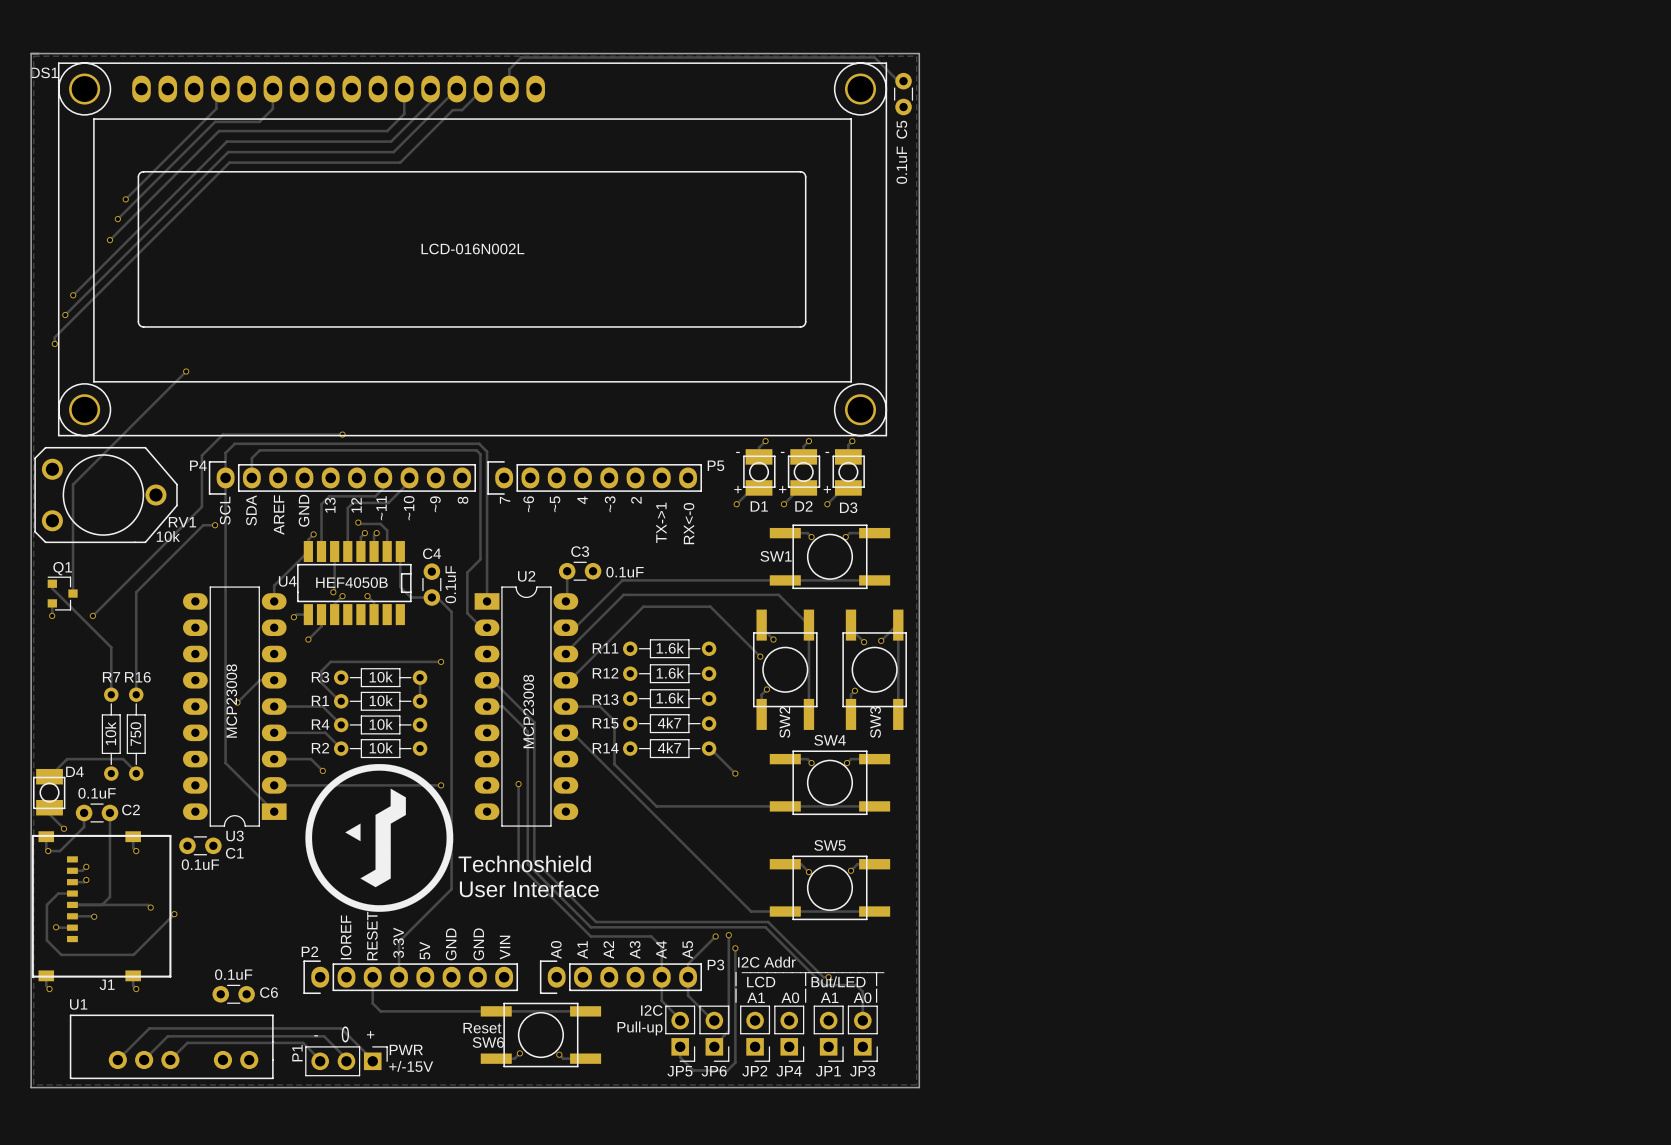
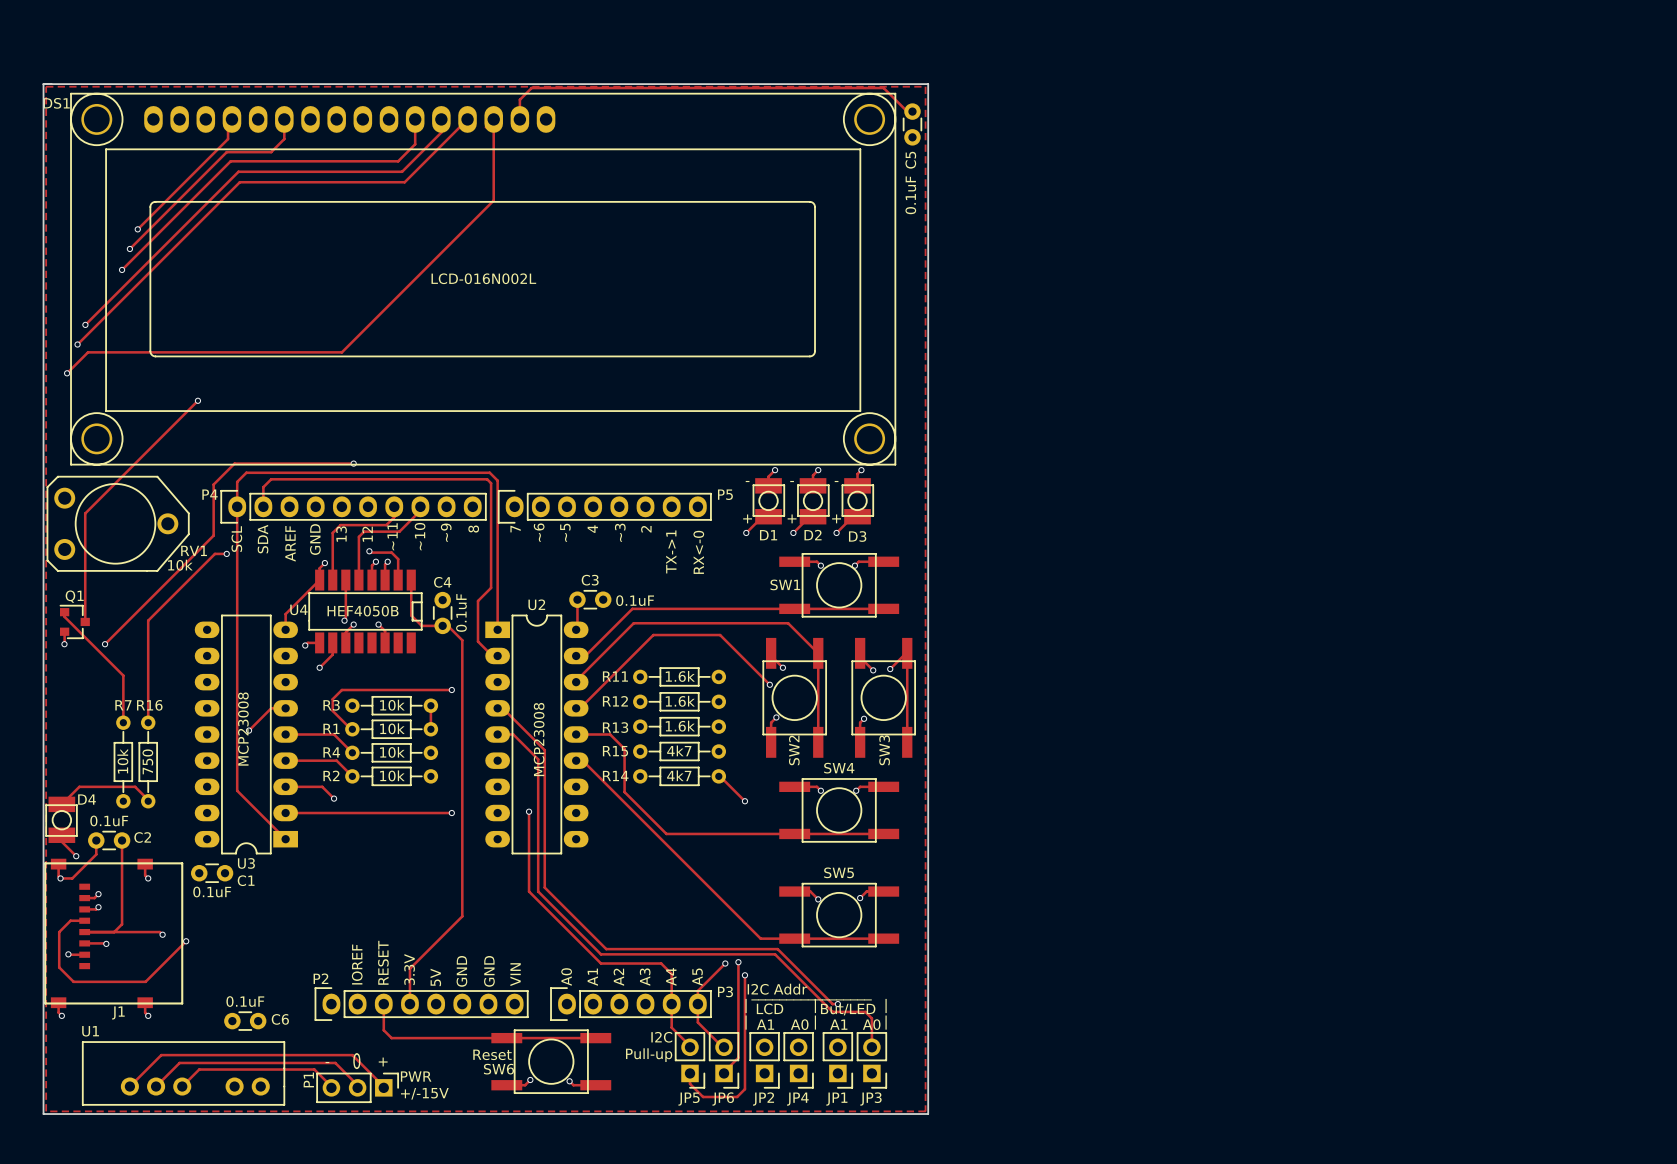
track: (475, 96) (462, 110) (452, 110) (400, 162) (229, 162) (54, 337) (54, 343) -> (493, 119) (493, 200) (341, 352) (88, 352) (67, 373)
drawing: [305, 764, 454, 912] -> none
text: Technoshield (524, 863) -> none
text: User Interface (529, 888) -> none

